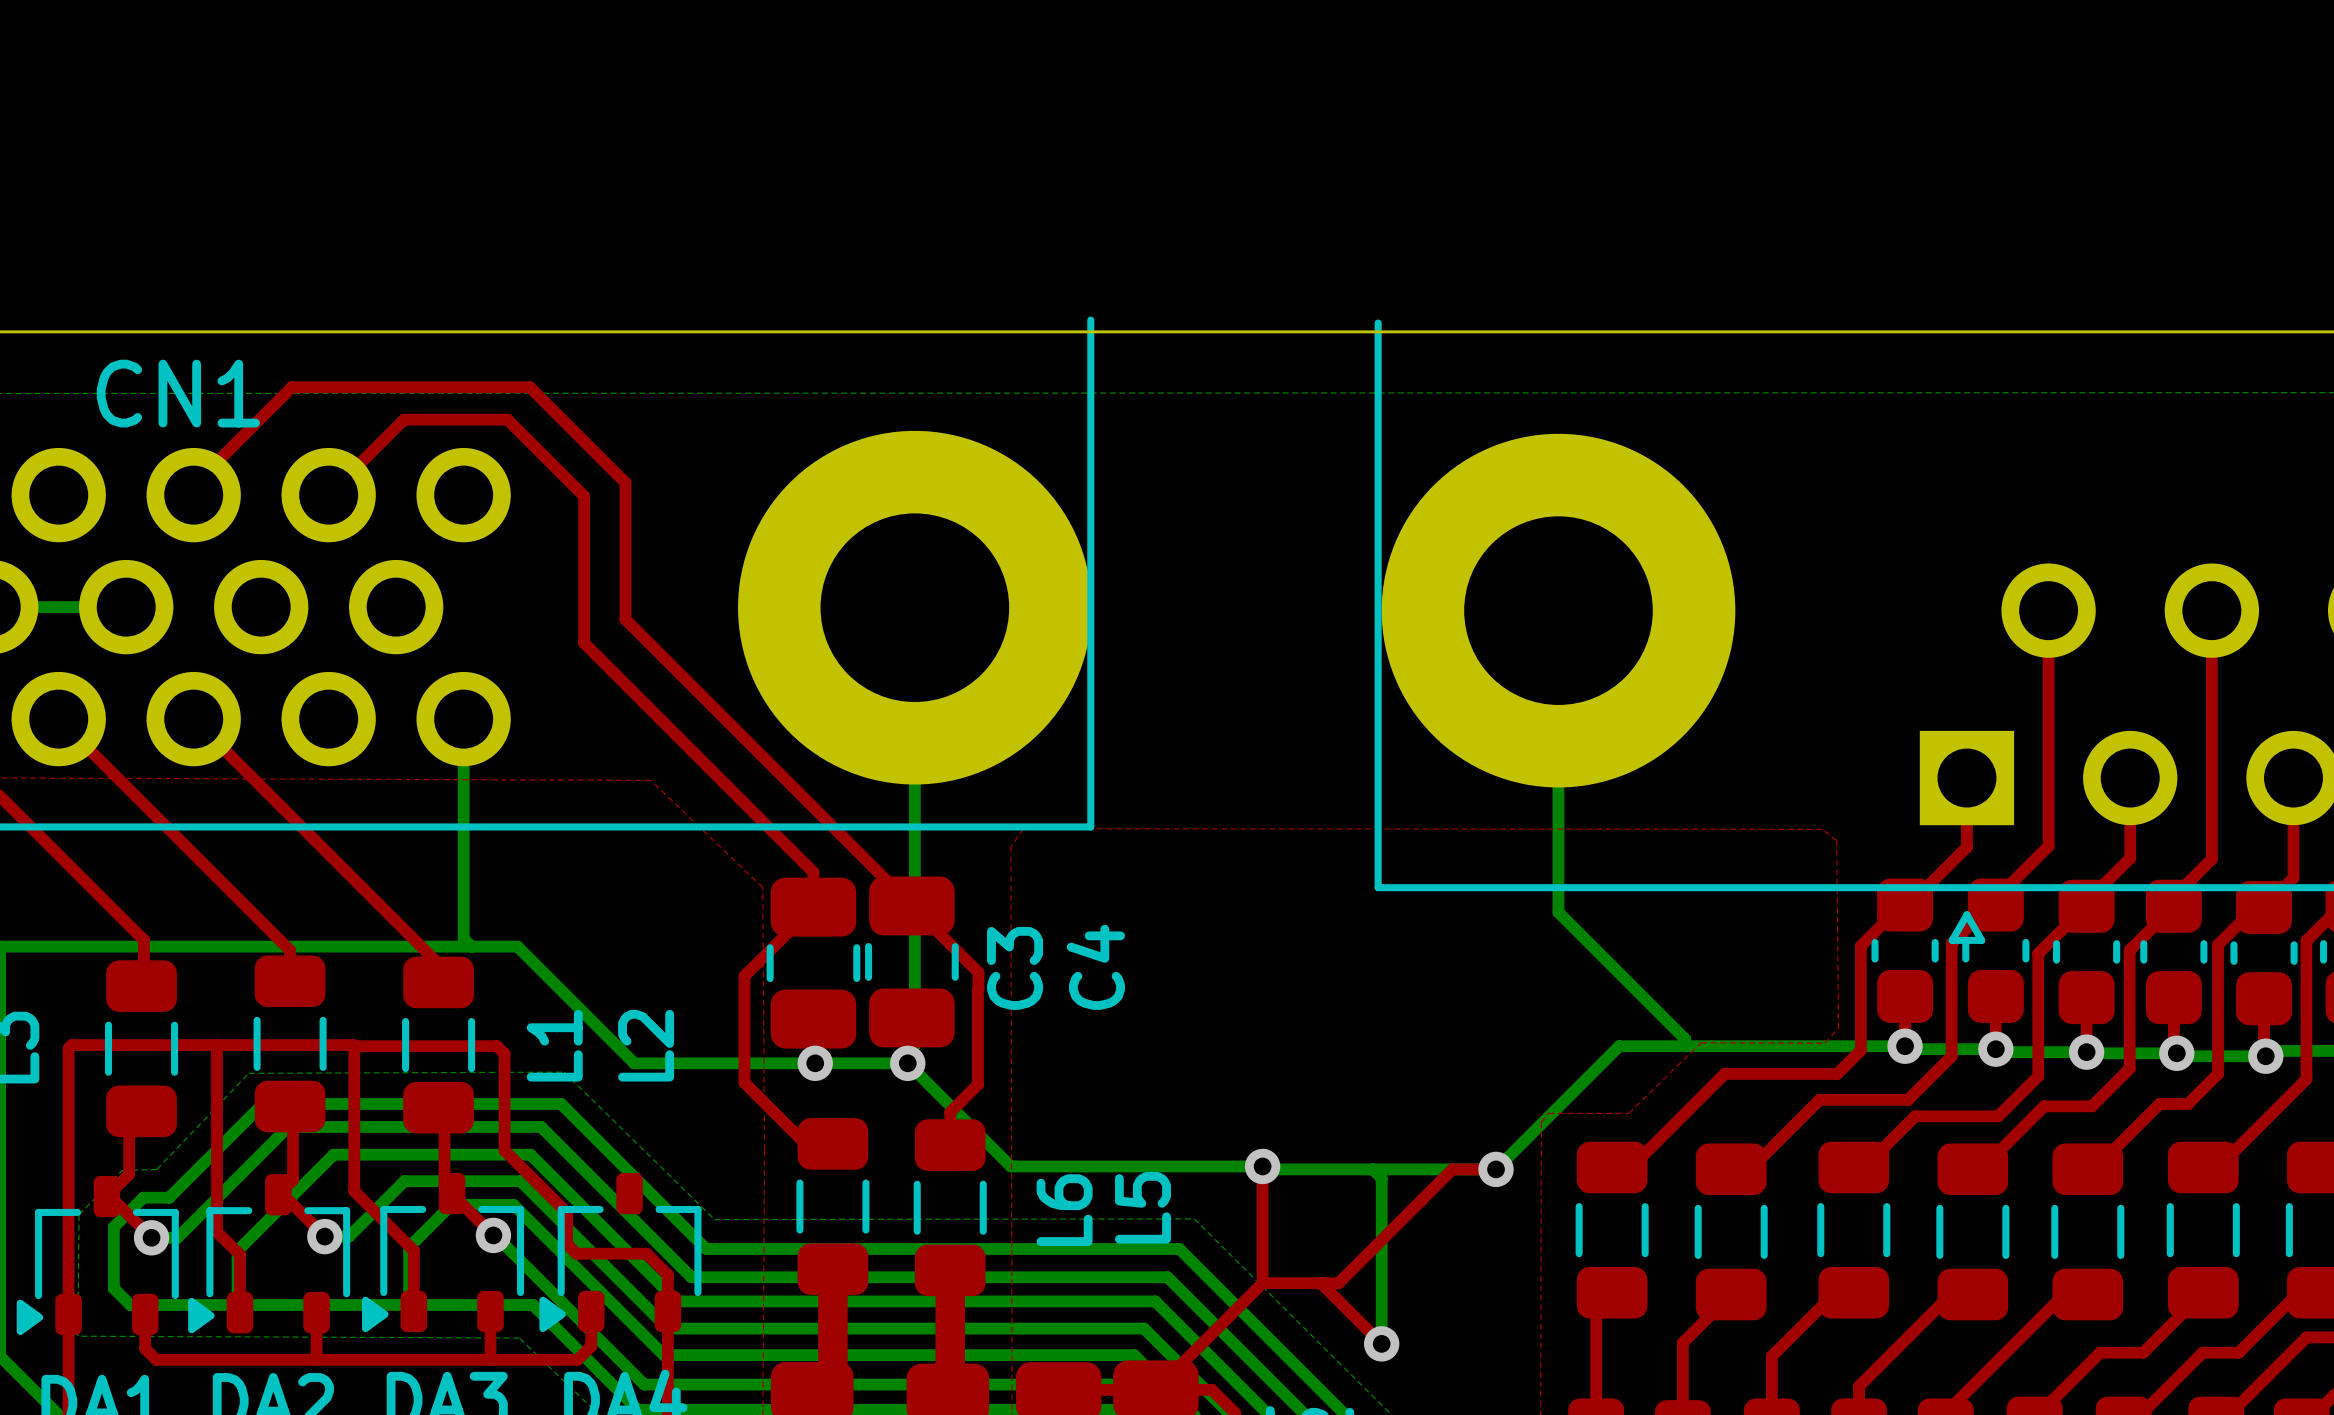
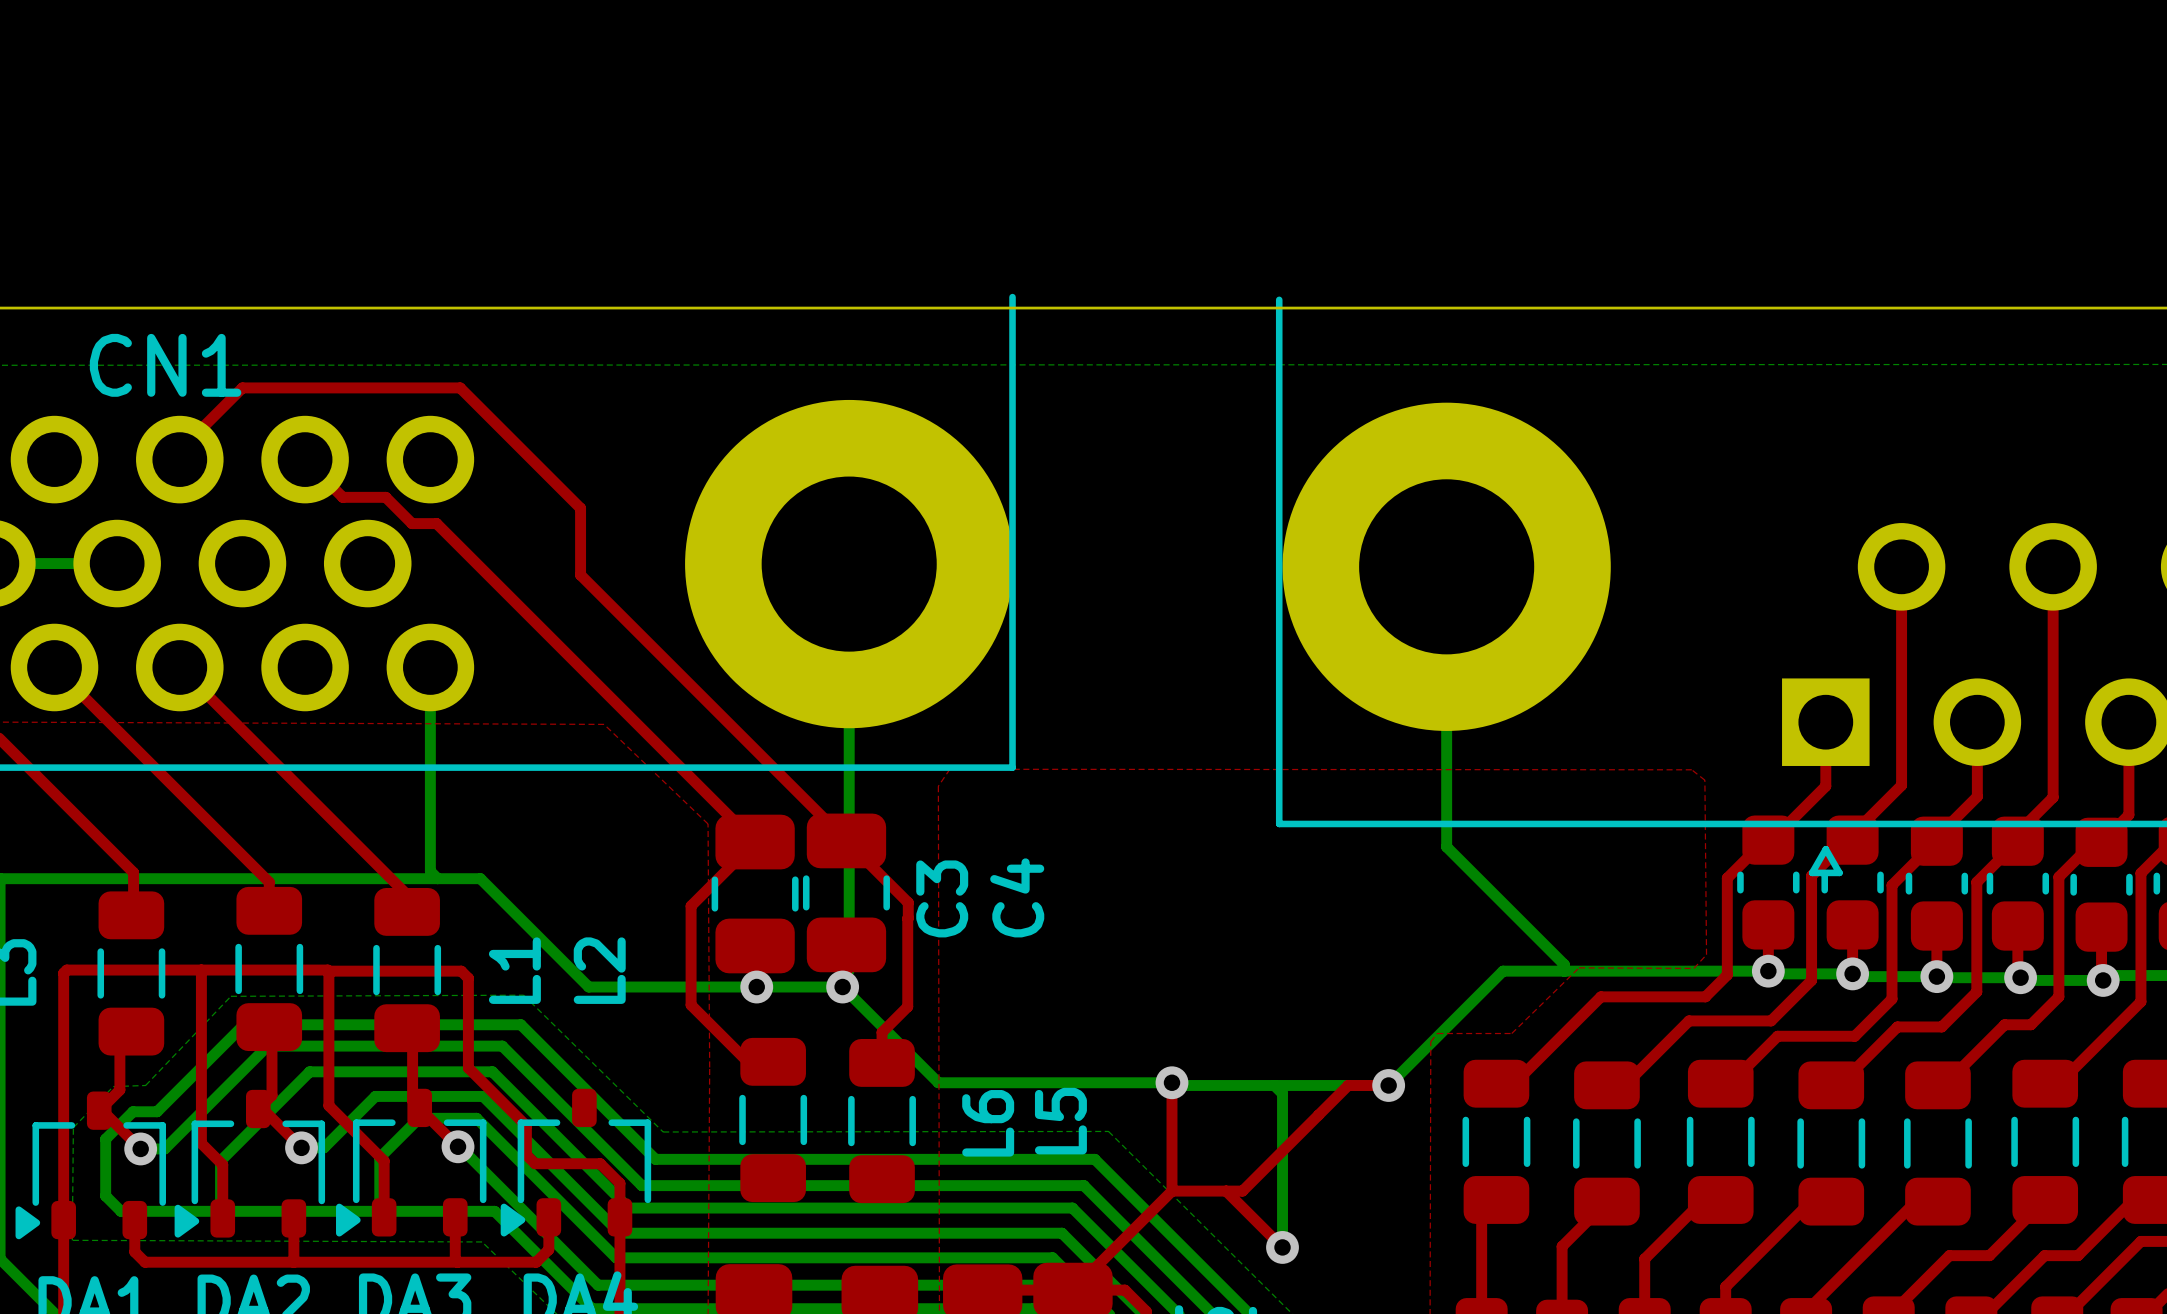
top track: (261, 417) (291, 387) (529, 387) (625, 482) (625, 547) -> (242, 387) (460, 387) (580, 508)
top track: (328, 495) (404, 419) (507, 419) (584, 496) (584, 643) (813, 872) (813, 907) -> (305, 459) (342, 497) (385, 497) (412, 523) (436, 523) (755, 842)
top track: (832, 1269) (832, 1371) (812, 1392) -> none
top track: (950, 1270) (950, 1391) (947, 1393) -> none

